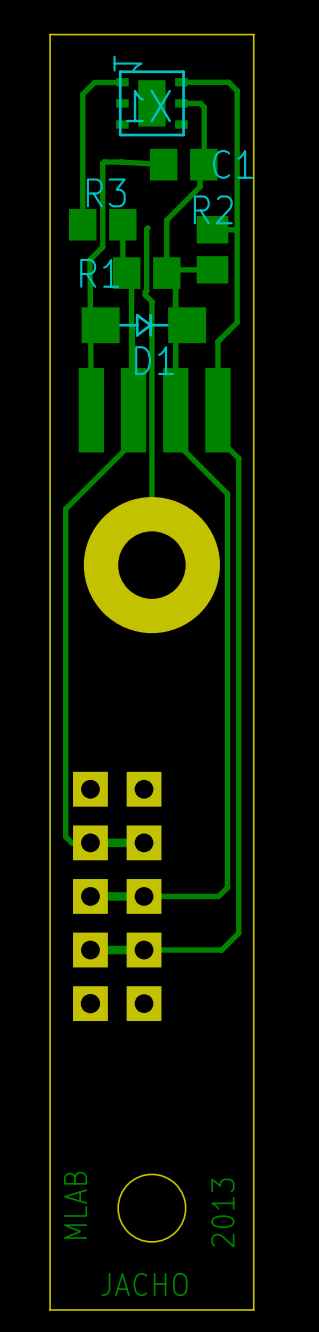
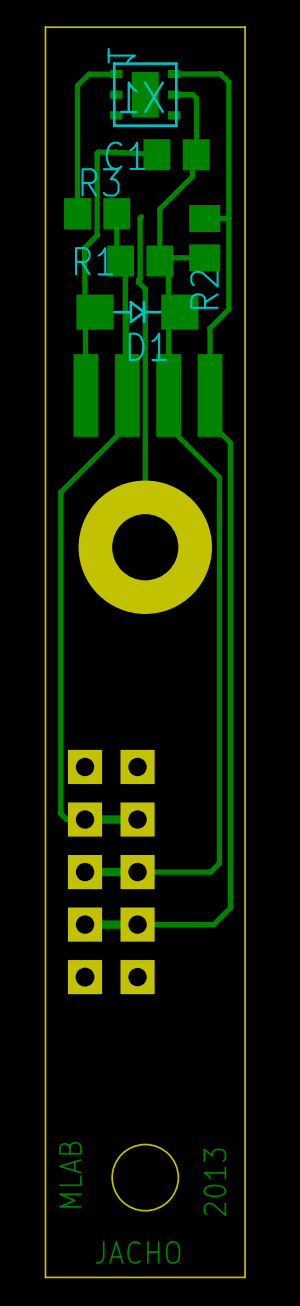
C1 name position: C1 (233, 164) -> C1 (125, 155)
R2 name rotation: 0° (213, 209) -> 90° counterclockwise (204, 289)
R2 name position: R2 (213, 209) -> R2 (204, 289)

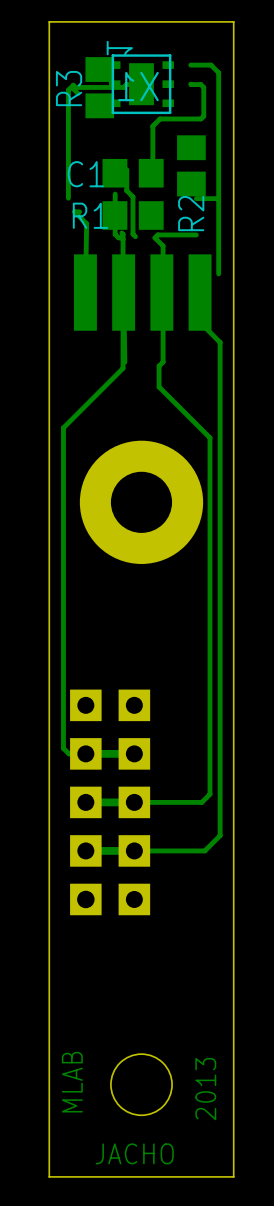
bottom track: (198, 73) (174, 73) -> none
bottom track: (116, 74) (89, 74) (77, 85) (77, 213) -> none
bottom track: none -> (137, 84) (126, 84) (123, 87) (71, 87) (78, 93)
bottom track: (174, 94) (192, 94) (196, 98) (196, 157) -> none
bottom track: none -> (190, 84) (200, 84) (203, 87) (203, 116) (200, 118) (160, 118) (152, 126) (152, 170) (150, 173)
bottom track: none -> (74, 88) (73, 85) (68, 90) (68, 198)
bottom track: (156, 154) (115, 152) (97, 153) (97, 235) (84, 247) (85, 395) -> none
C1 position: (176, 154) -> (133, 173)
bottom track: (199, 154) (192, 161) (192, 176) (159, 209) (159, 260) -> none
R3 name position: R3 (100, 182) -> R3 (69, 88)
bottom track: none -> (126, 169) (126, 190) (132, 196) (132, 234) (135, 236)
R3 rotation: 0° (97, 213) -> 90° clockwise (99, 87)
R3 position: (97, 213) -> (99, 87)
bottom track: (141, 216) (138, 282) (145, 289) (145, 547) -> none
bottom track: none -> (79, 211) (74, 211) (86, 223) (85, 292)
R2 position: (204, 238) -> (191, 165)
R1 position: (140, 260) -> (133, 215)
bottom track: (228, 300) (228, 309) (209, 328) (209, 395) (211, 423) (230, 442) -> (205, 285) (202, 287) (202, 324) (220, 342) (220, 405)
D1: (137, 312) -> none
part position: (147, 395) -> (142, 292)
bottom track: (127, 400) (127, 425) (60, 492) -> (123, 368) (63, 427) (63, 451)

